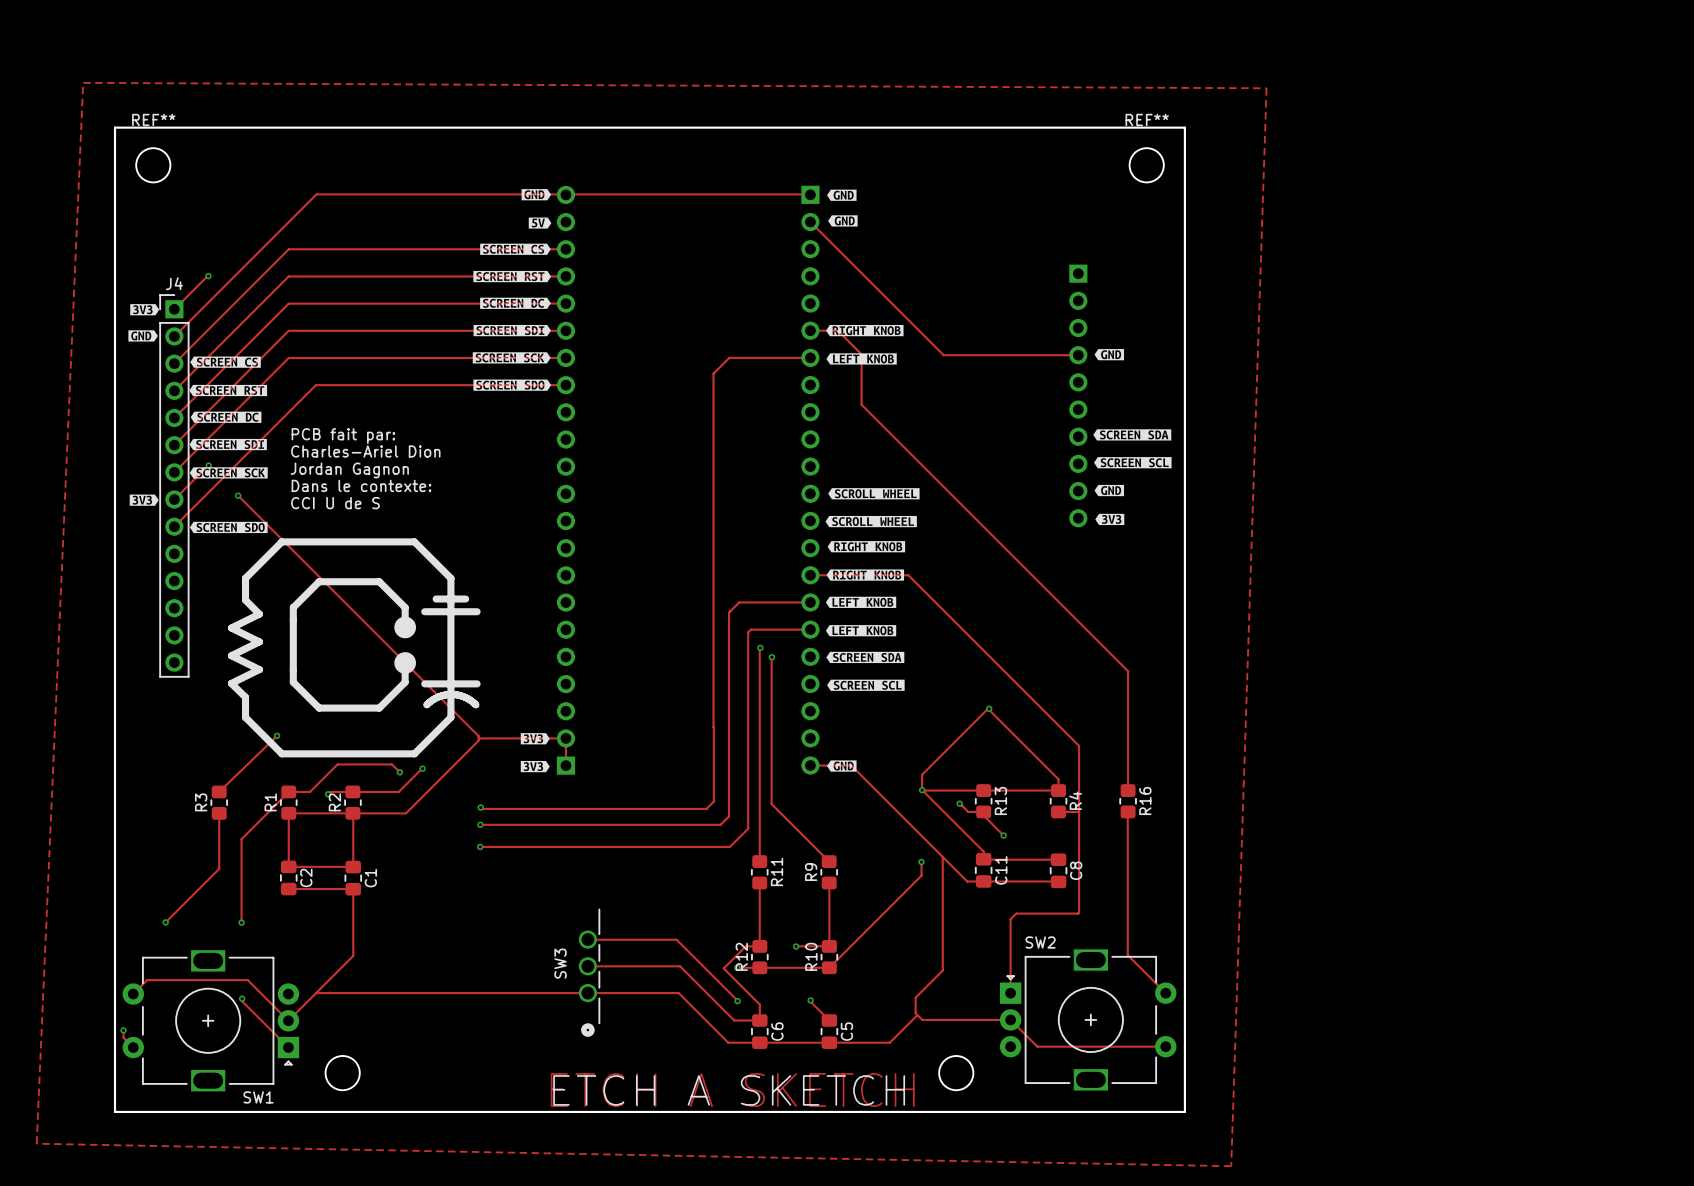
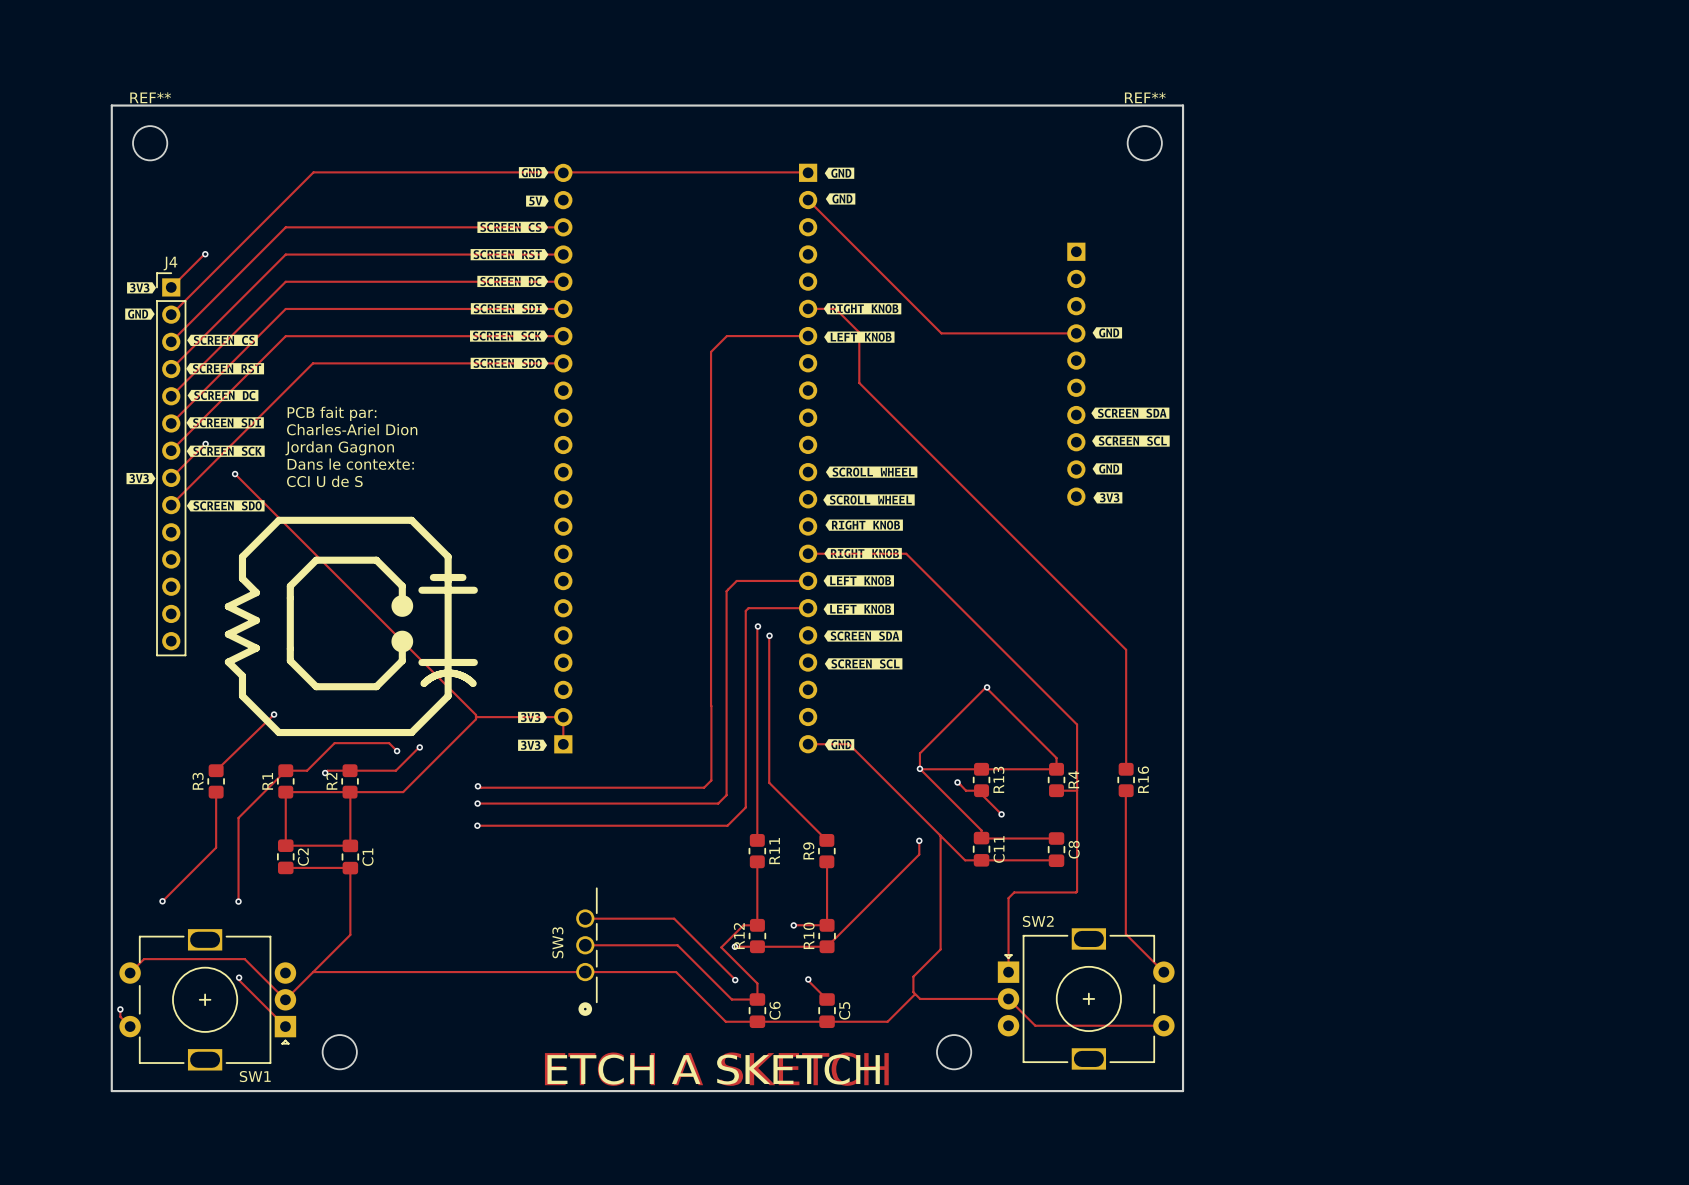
zone outline: (83, 82) (1266, 88) (1231, 1166) (36, 1143) (83, 82) -> none

